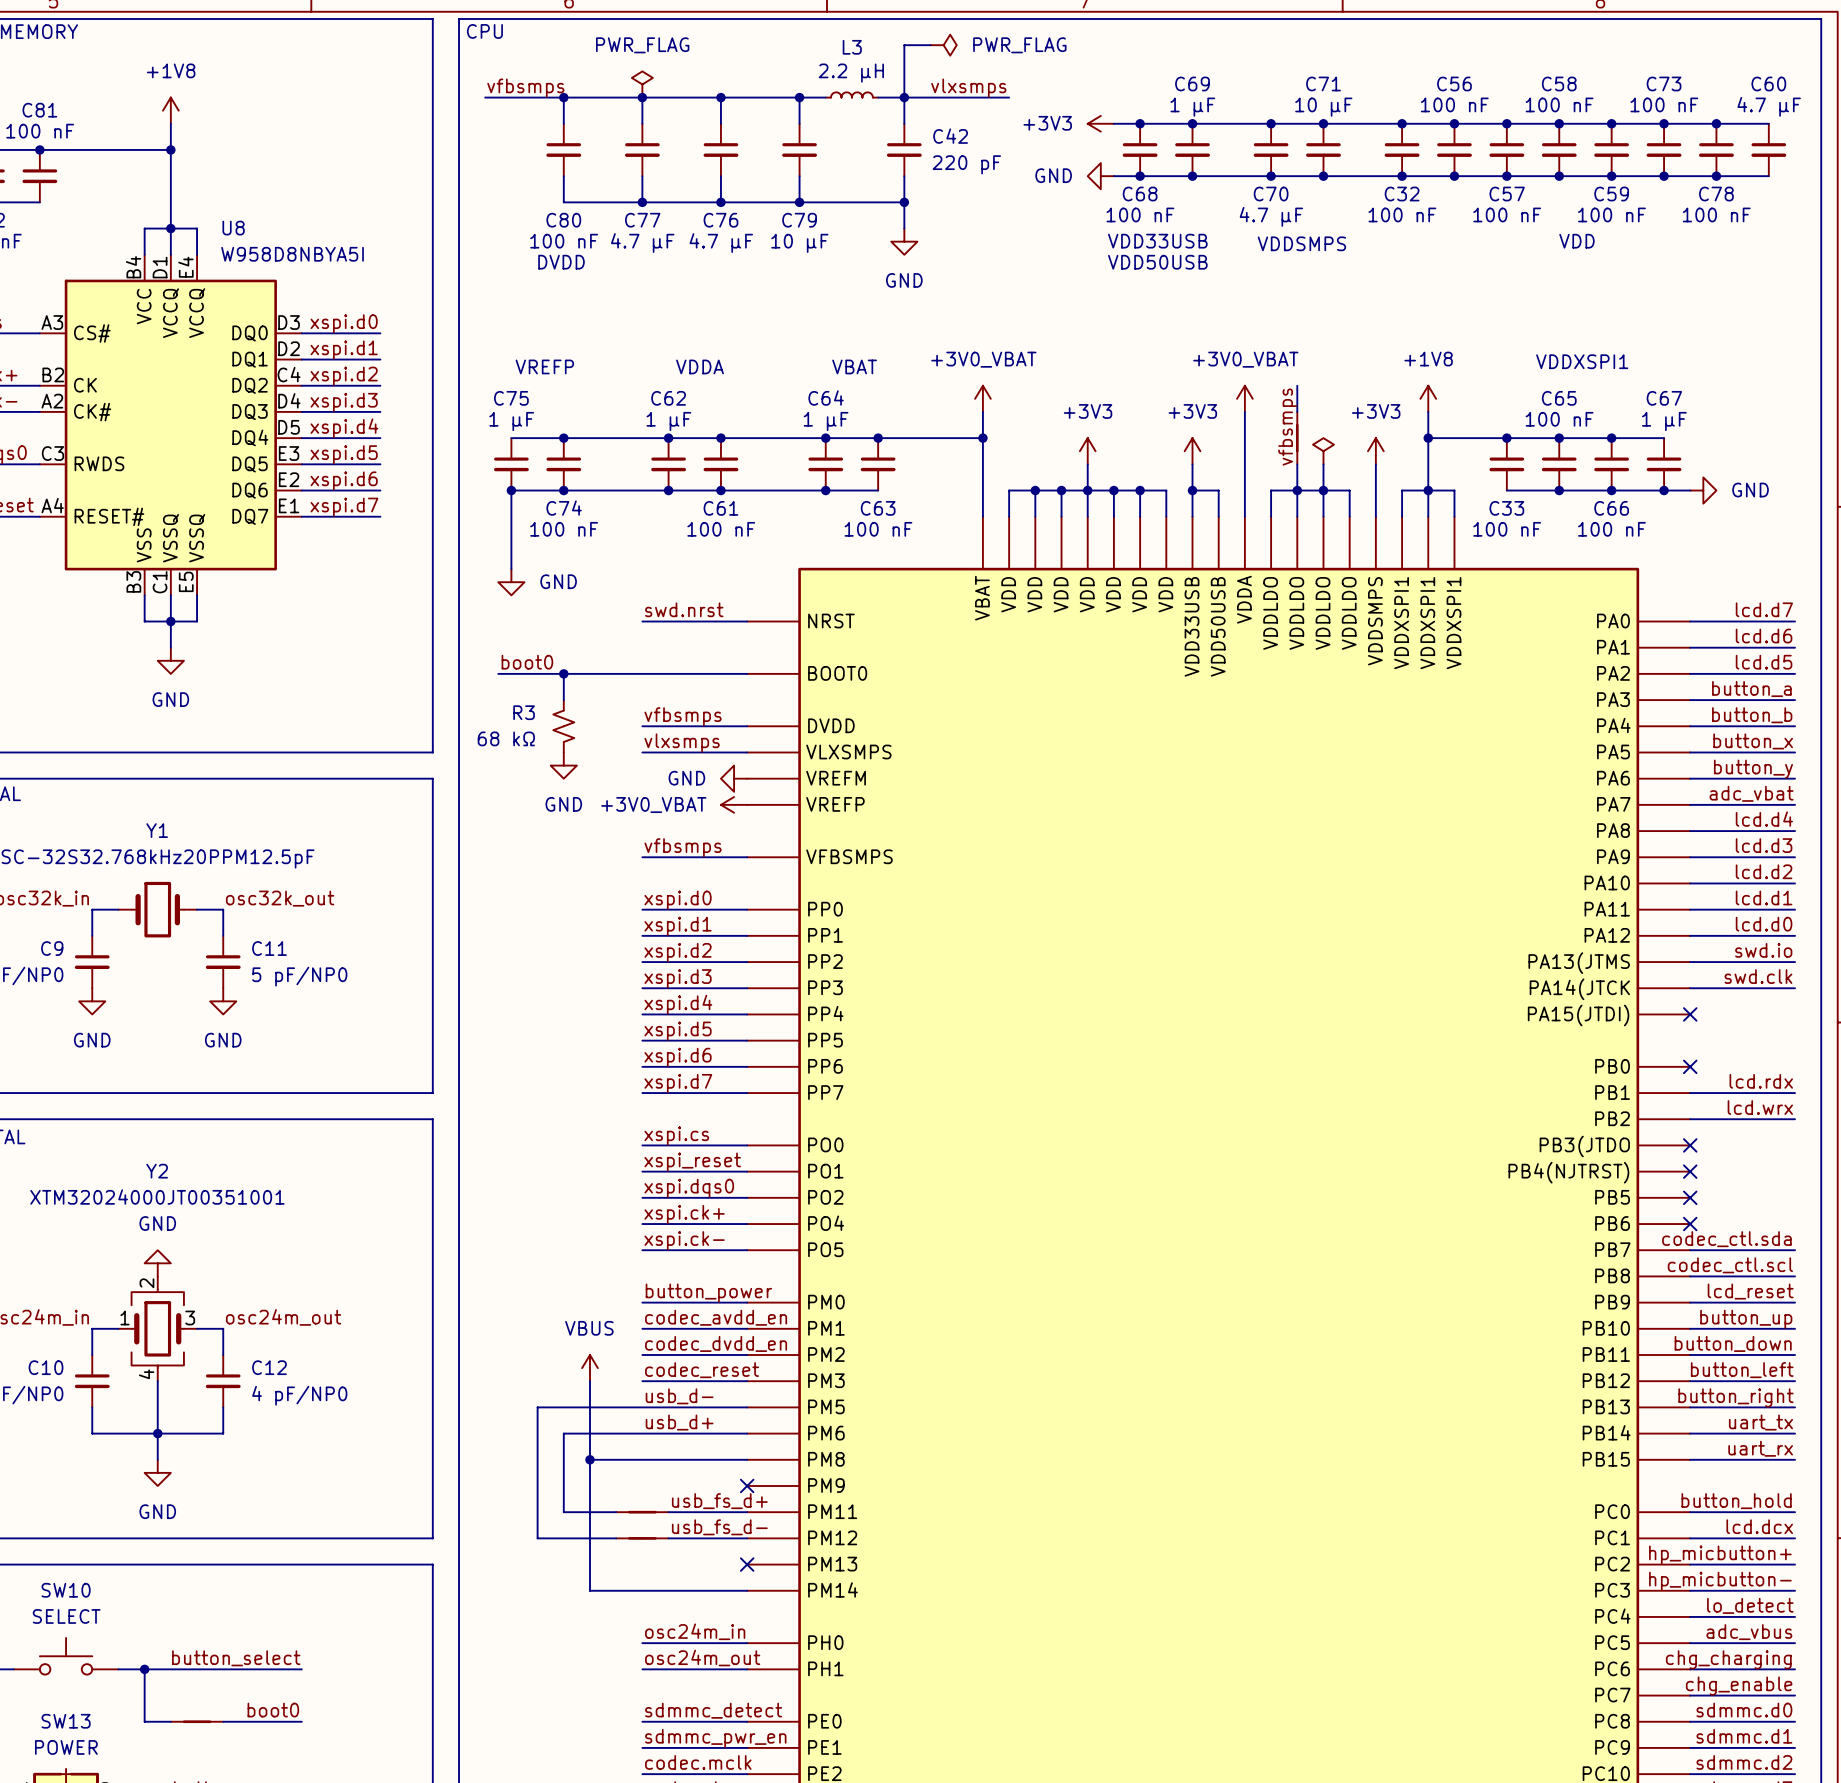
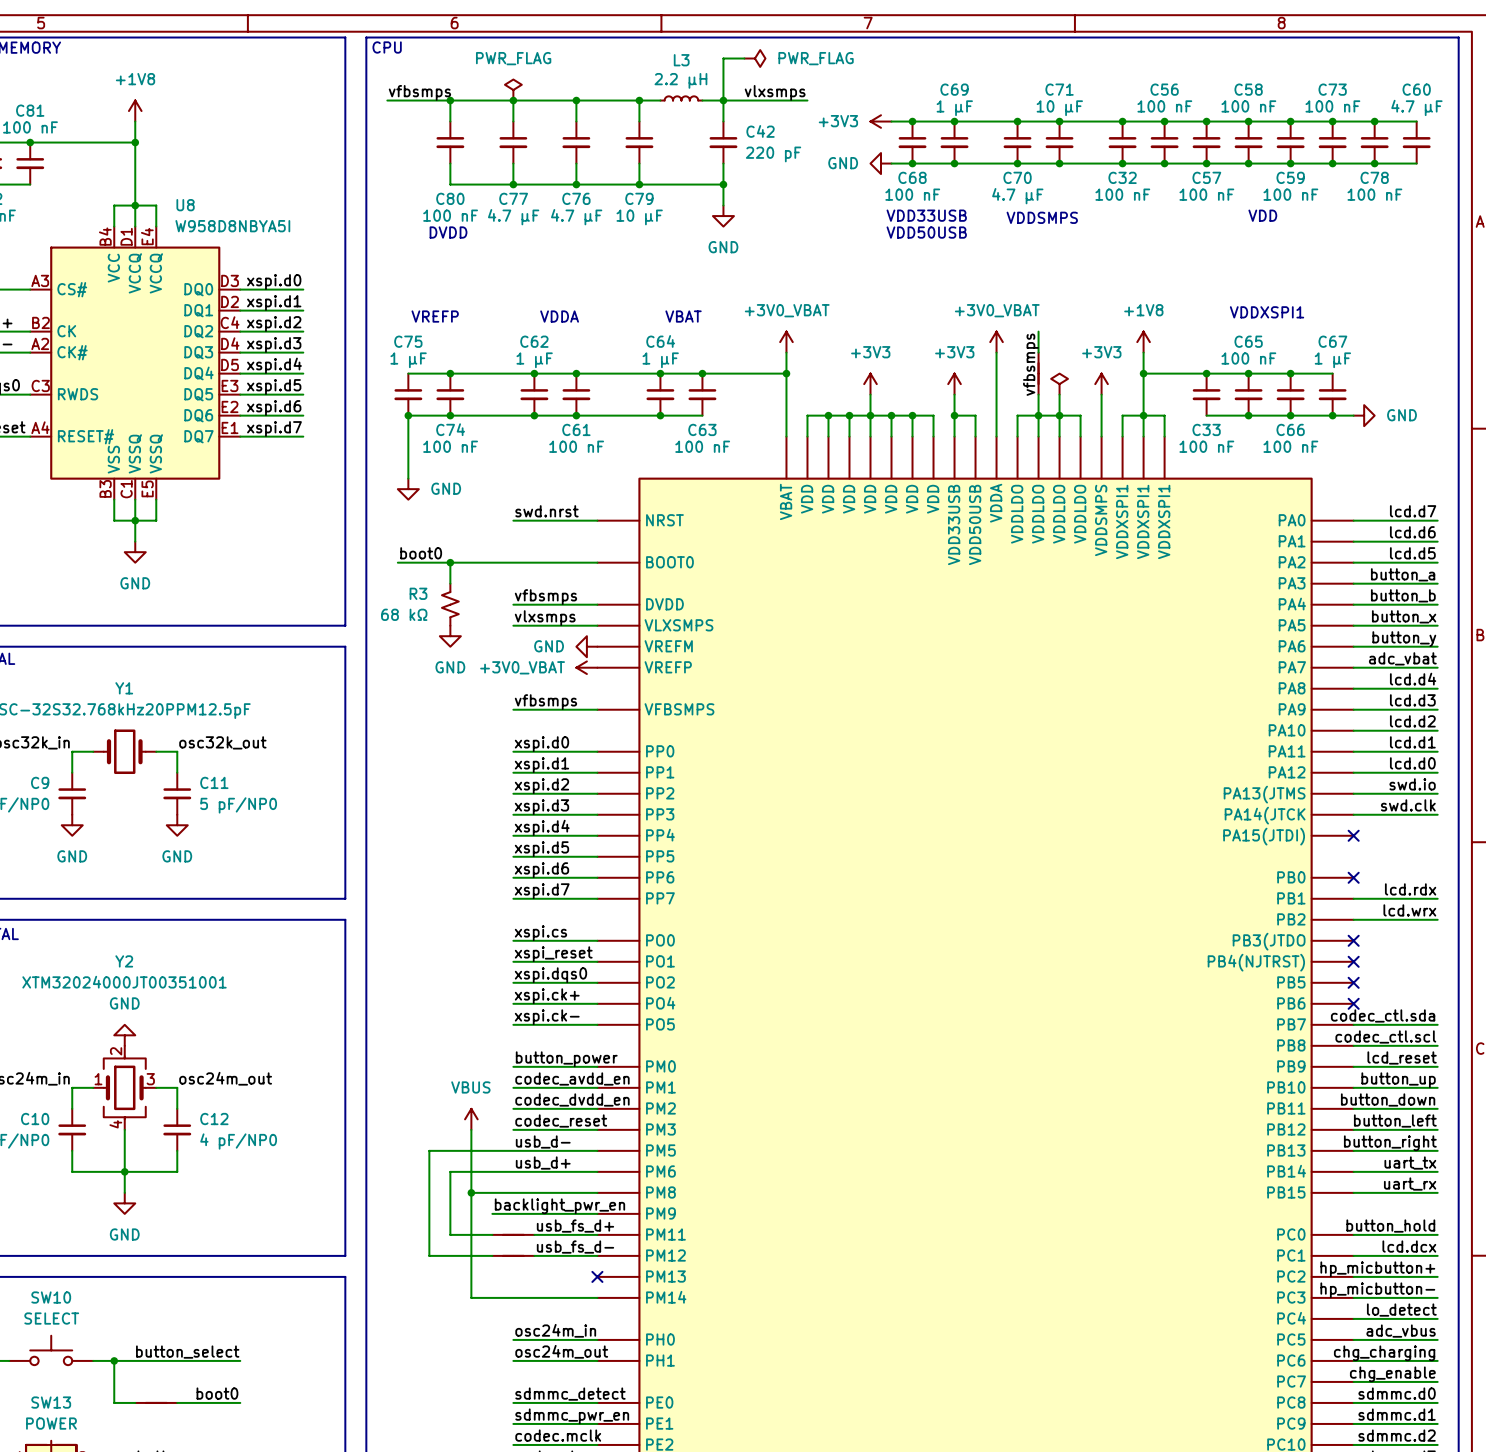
label: none -> backlight_pwr_en (559, 1206)
wire: none -> (492, 1213) (597, 1213)
no-connect mark: (747, 1485) -> none

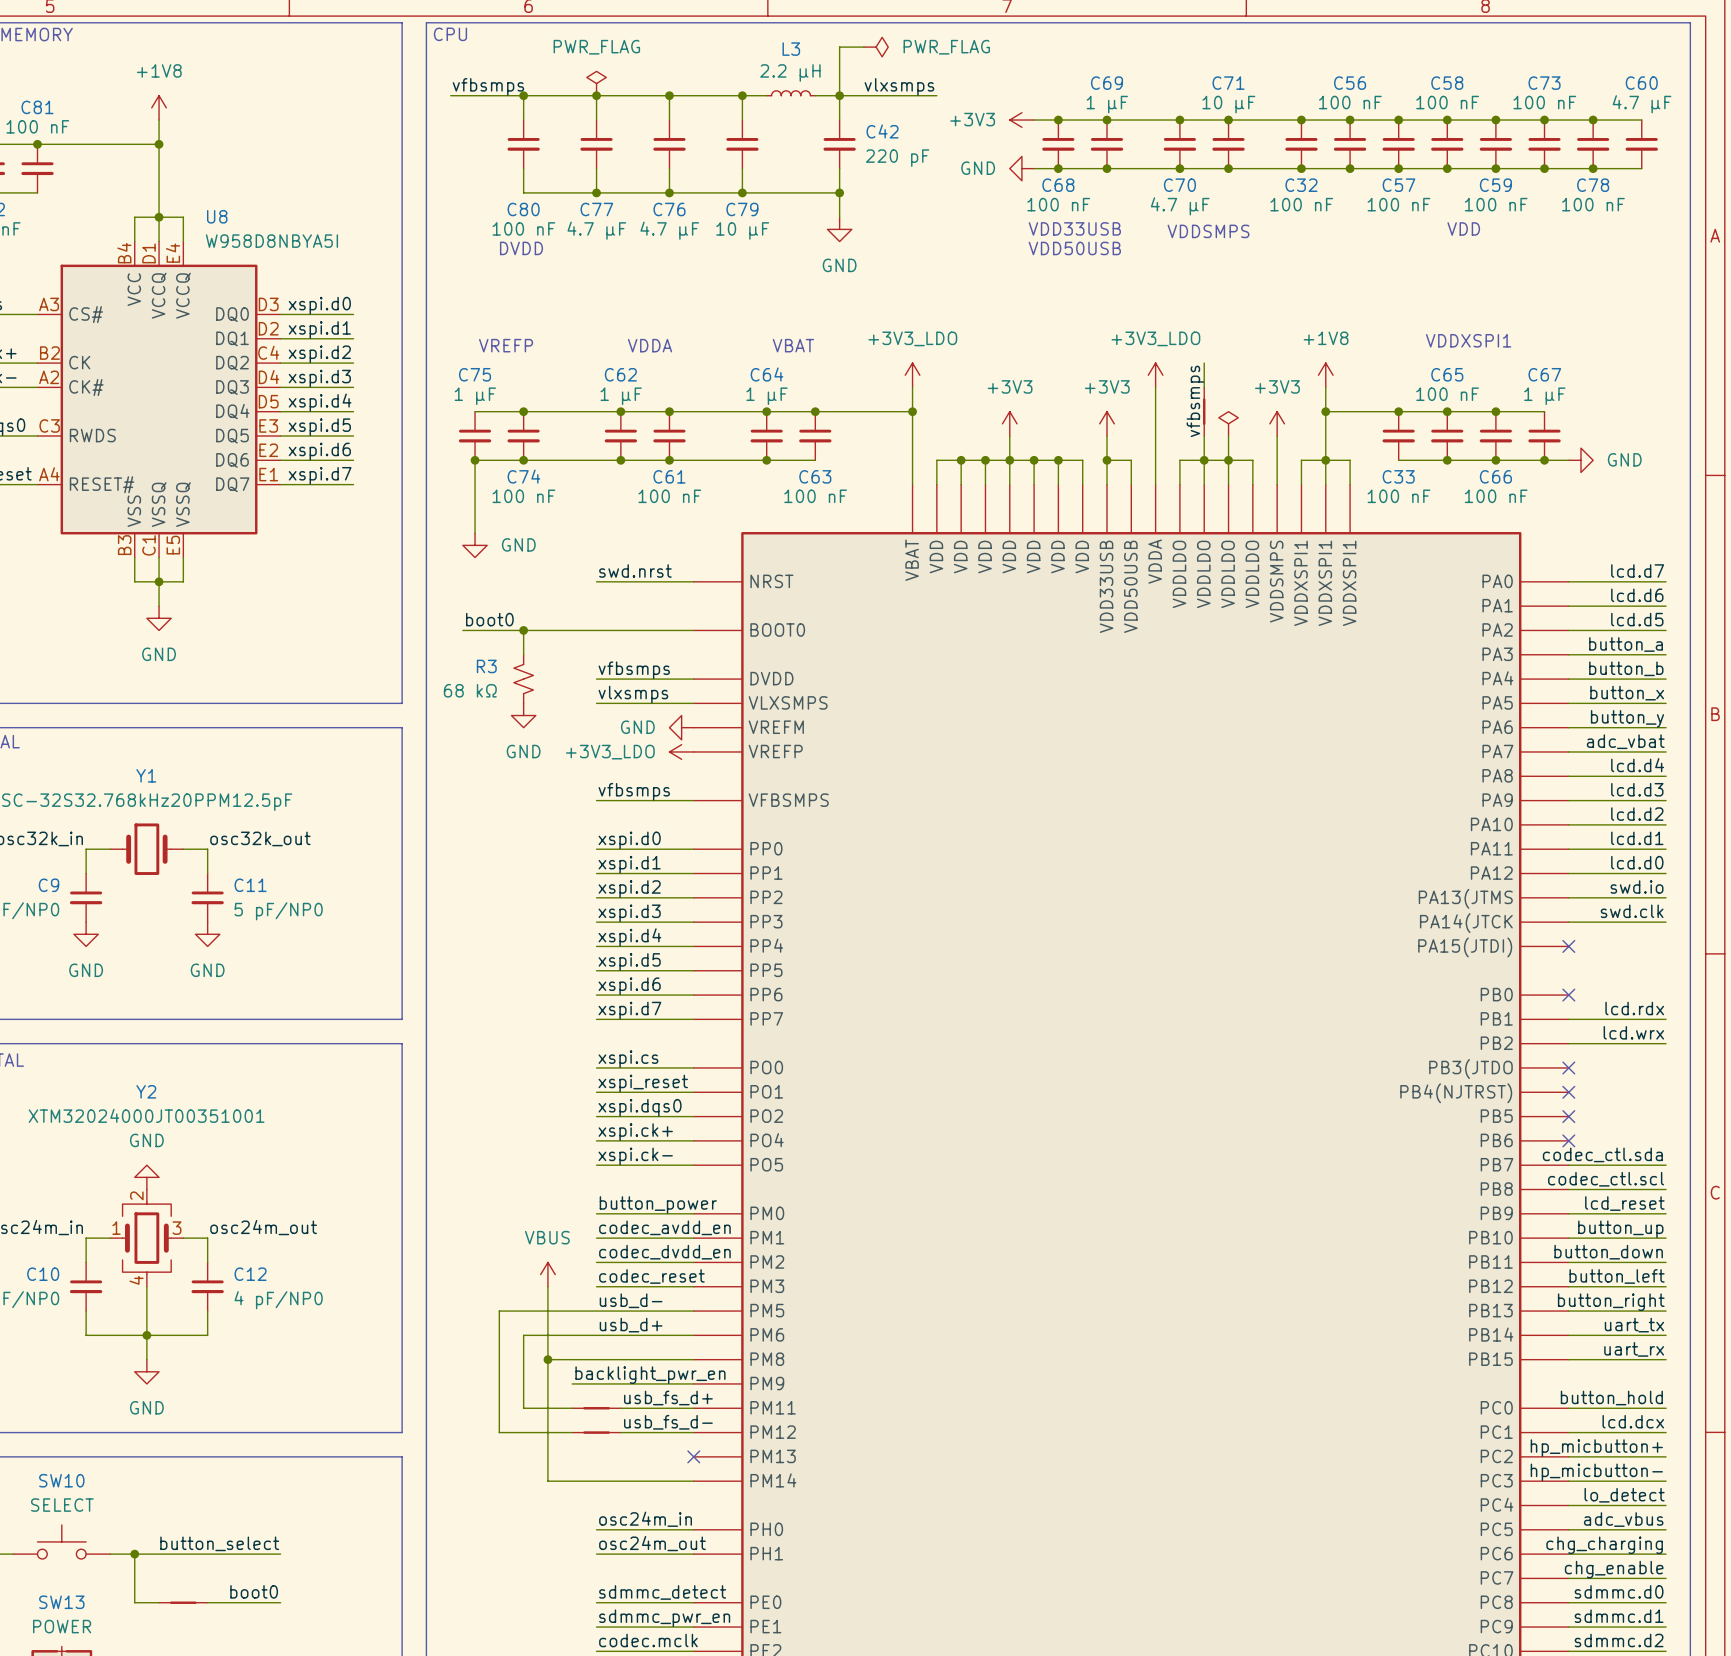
power symbol: +3V0_VBAT (786, 342) -> +3V3_LDO (912, 375)
power symbol: +3V0_VBAT (996, 342) -> +3V3_LDO (1155, 375)
power symbol: +3V0_VBAT (586, 667) -> +3V3_LDO (681, 751)

